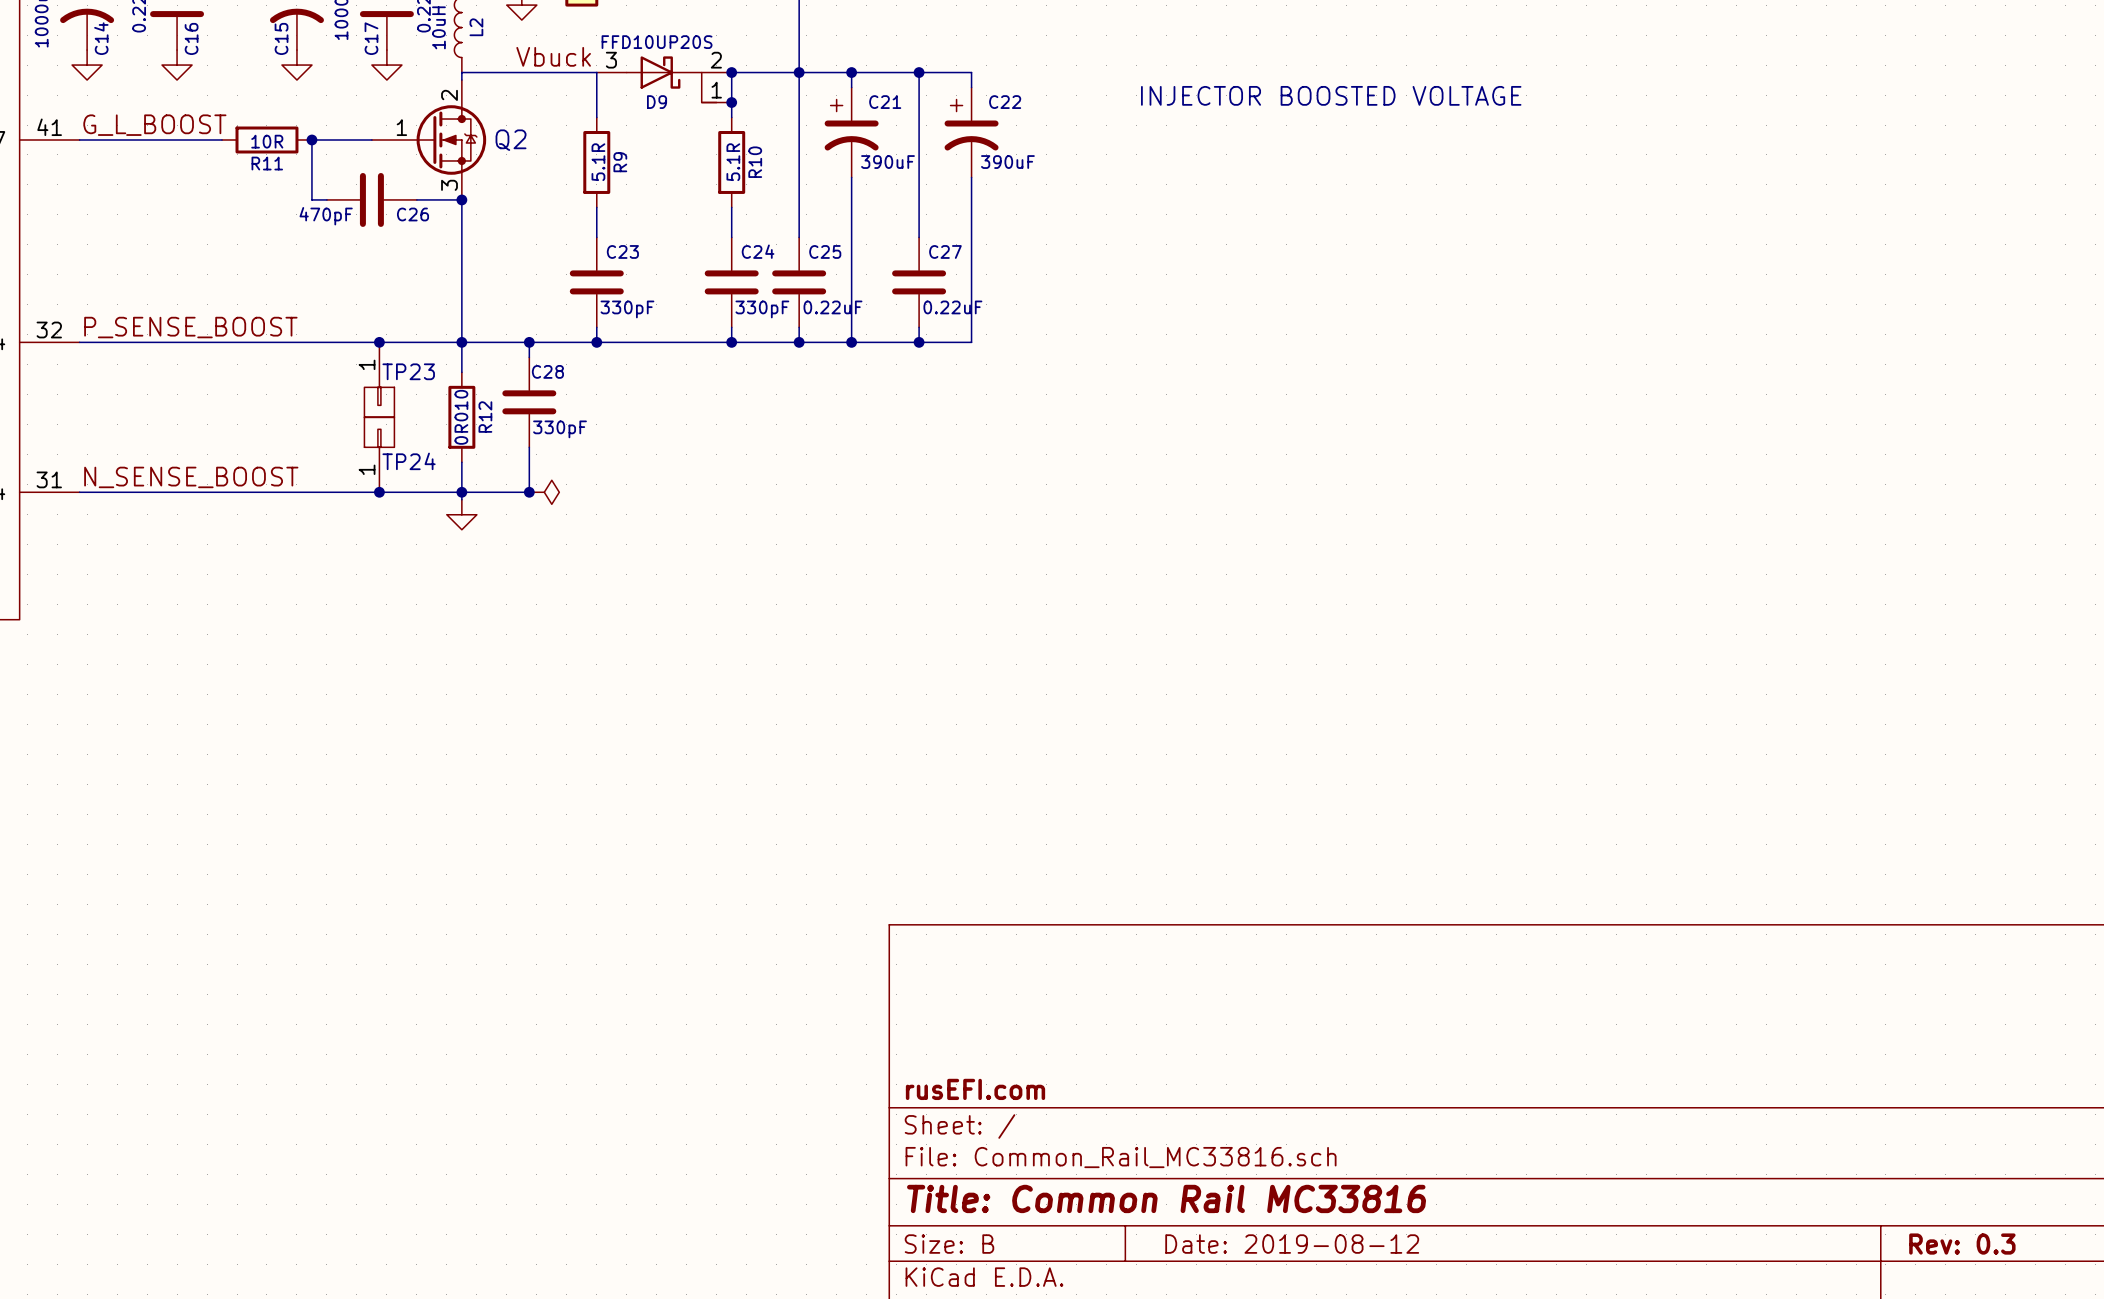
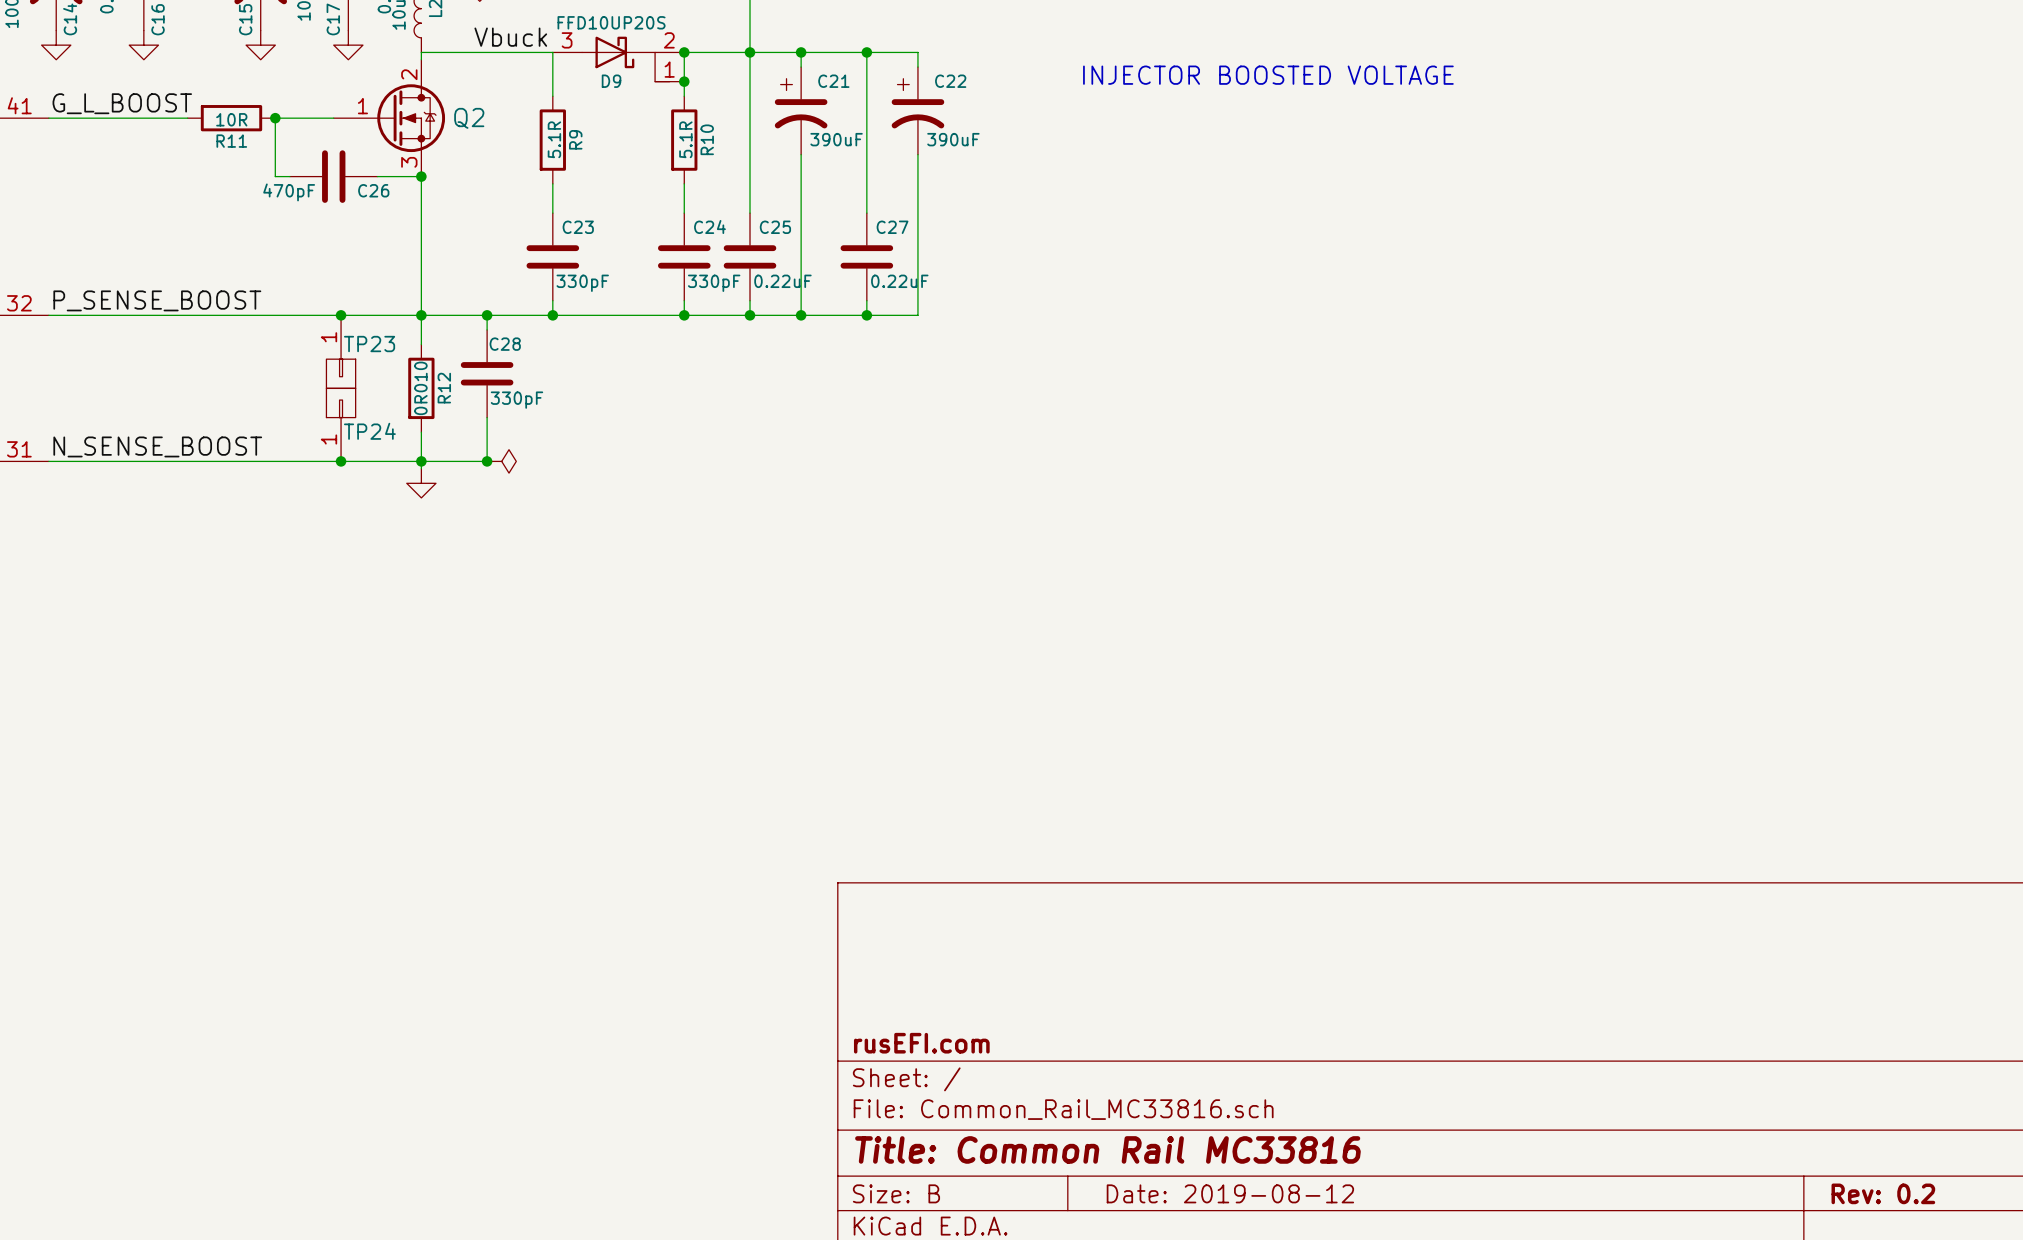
title block: Rev: 0.3 (1962, 1244) -> Rev: 0.2 (1883, 1193)

